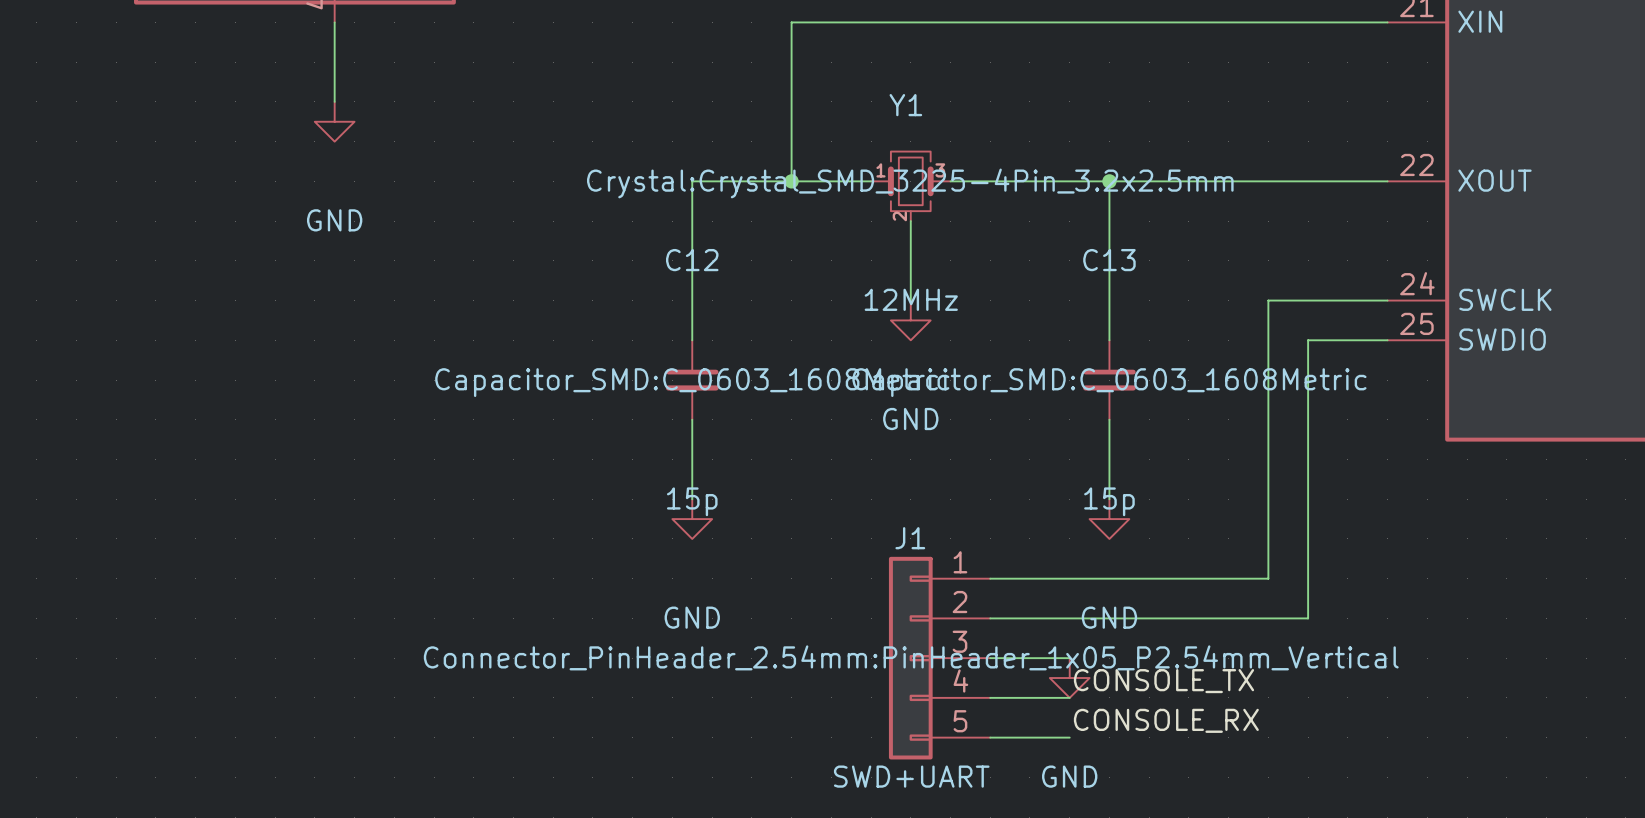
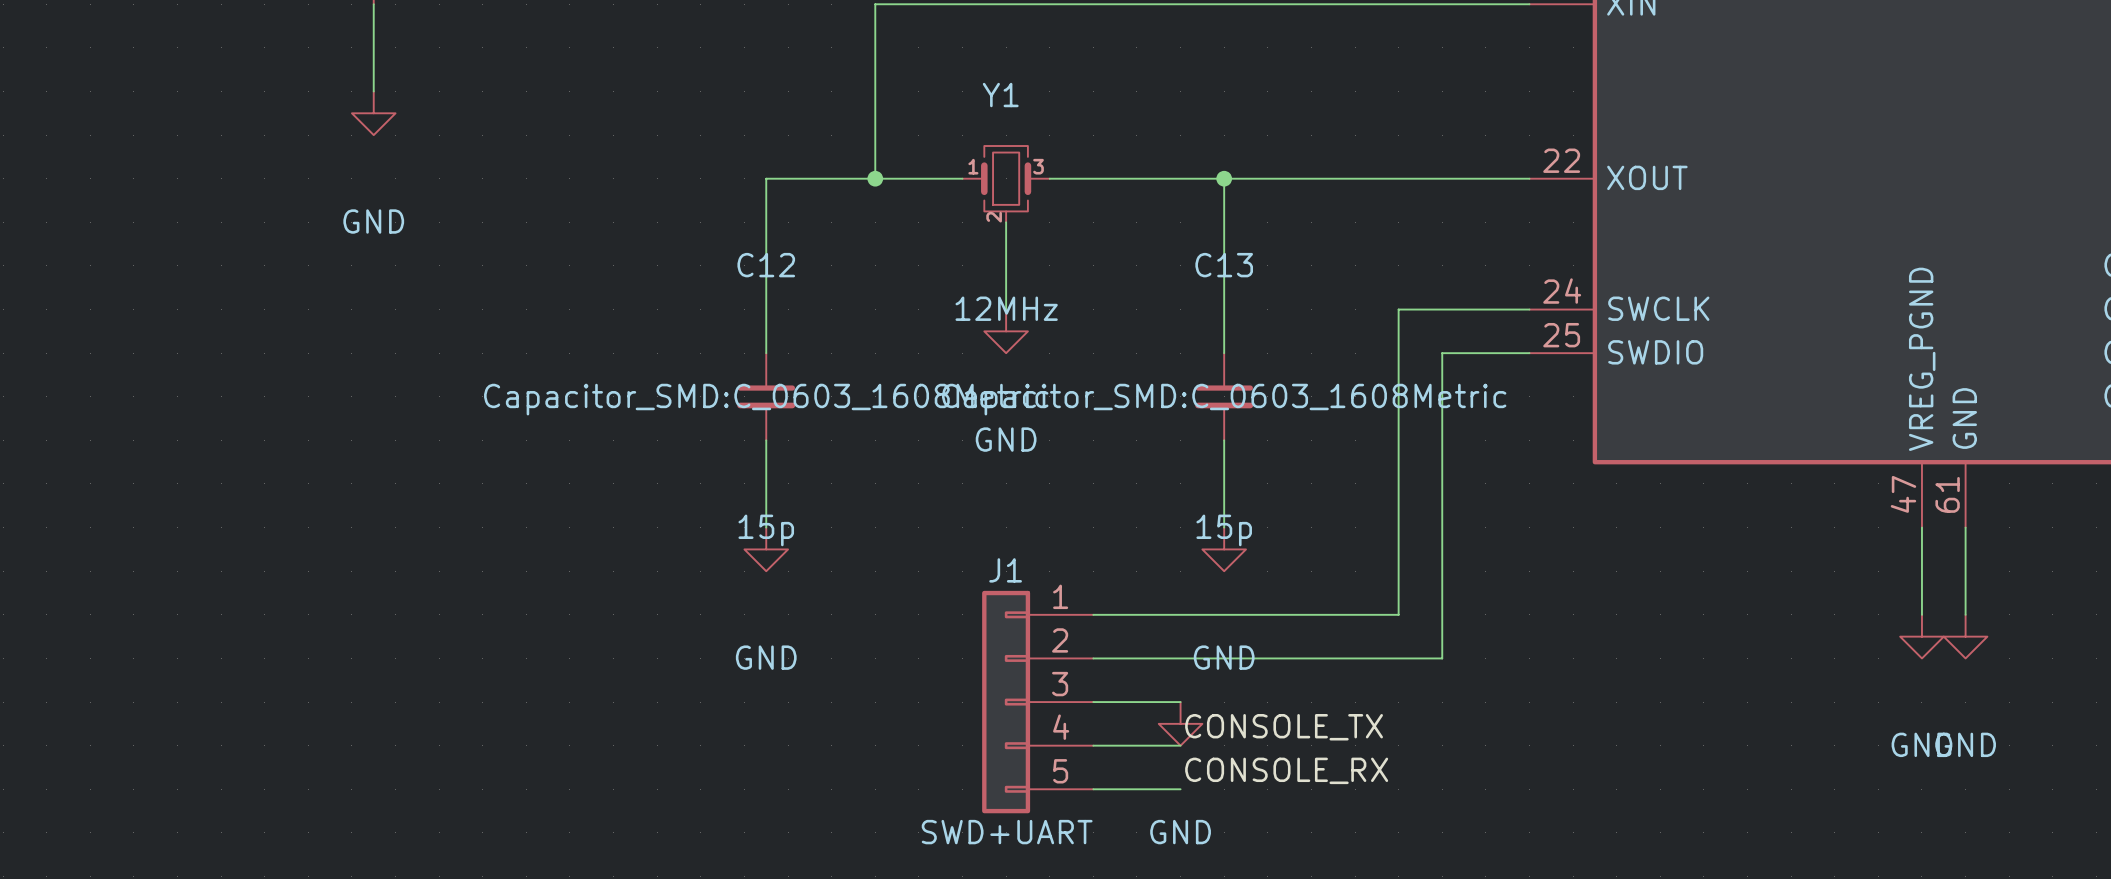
Y1 text: Crystal:Crystal_SMD_3225-4Pin_3.2x2.5mm (910, 183) -> none
J1 text: Connector_PinHeader_2.54mm:PinHeader_1x05_P2.54mm_Vertical (911, 657) -> none

